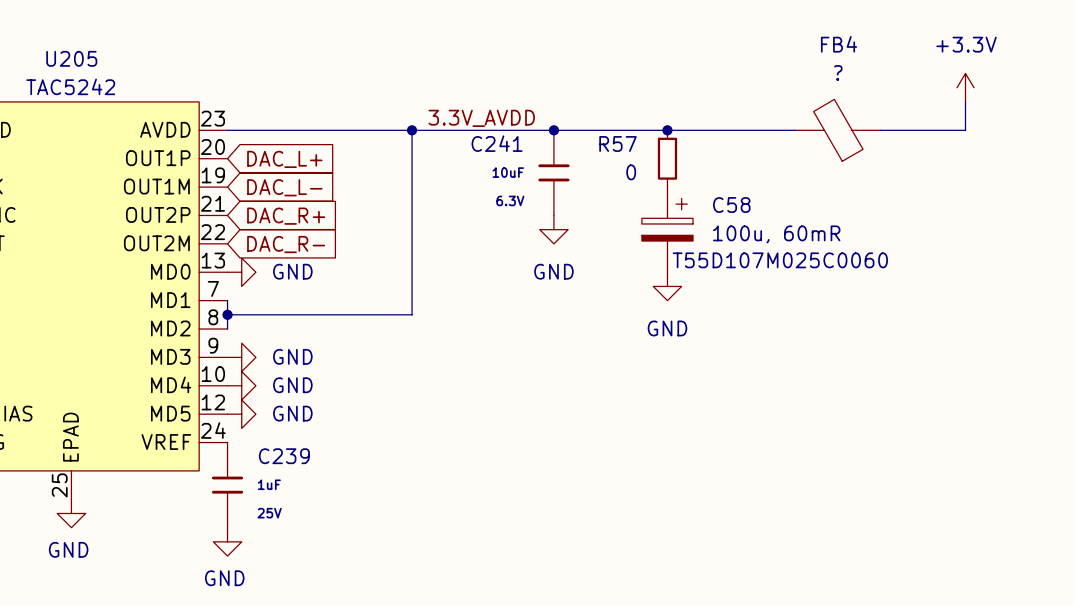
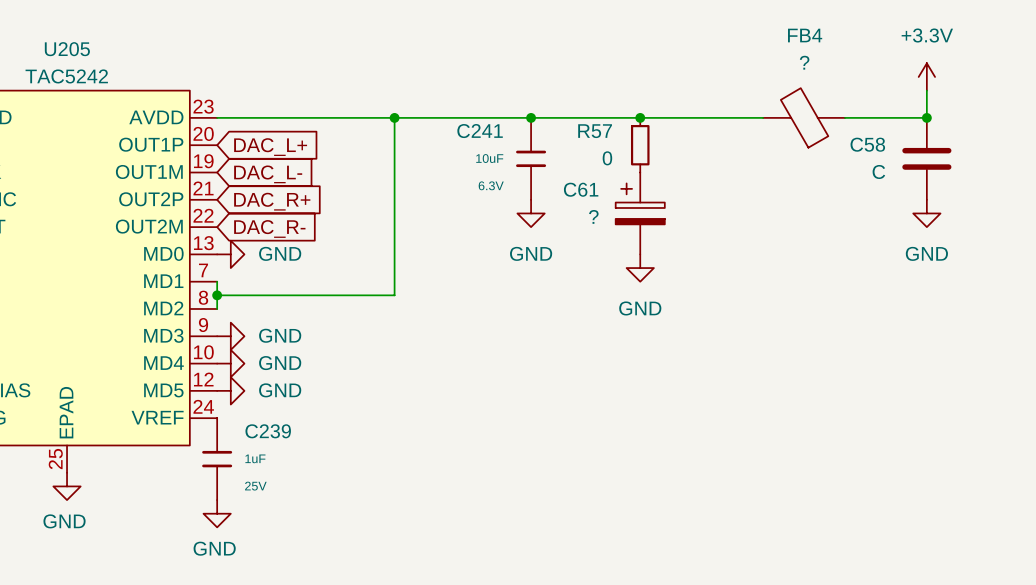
label: 3.3V_AVDD (481, 118) -> none
junction: none -> (926, 117)
C58 symbol: [641, 187, 694, 273] -> [902, 117, 952, 200]
C58 name position: C58 (731, 205) -> C58 (867, 144)
C61: none -> ? (640, 213)
power symbol: none -> GND (926, 213)
C58 value: 100u, 60mR (776, 234) -> C (878, 171)
C58 text: T55D107M025C0060 (780, 260) -> none

